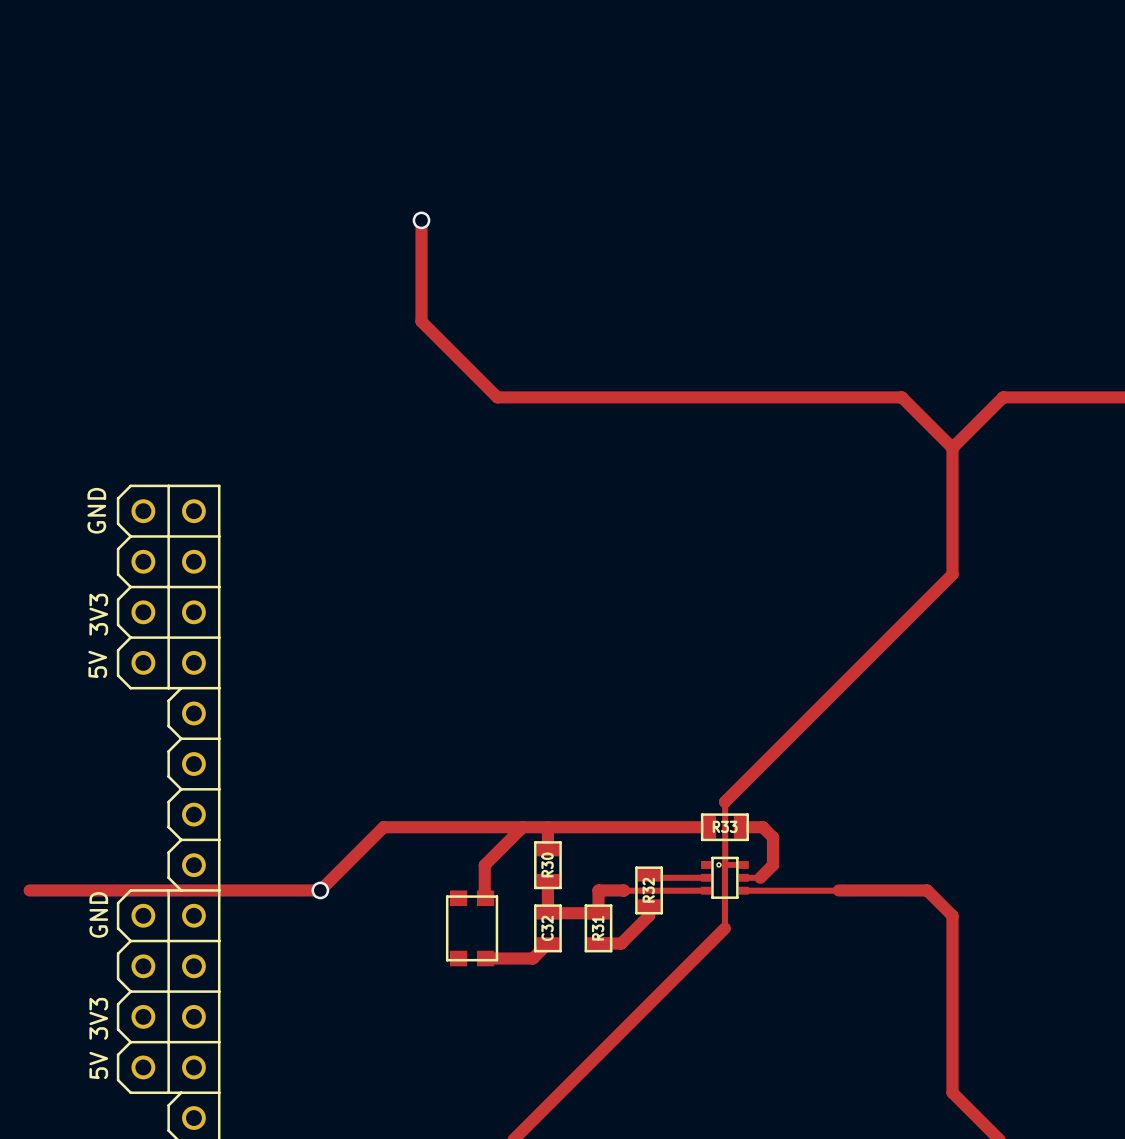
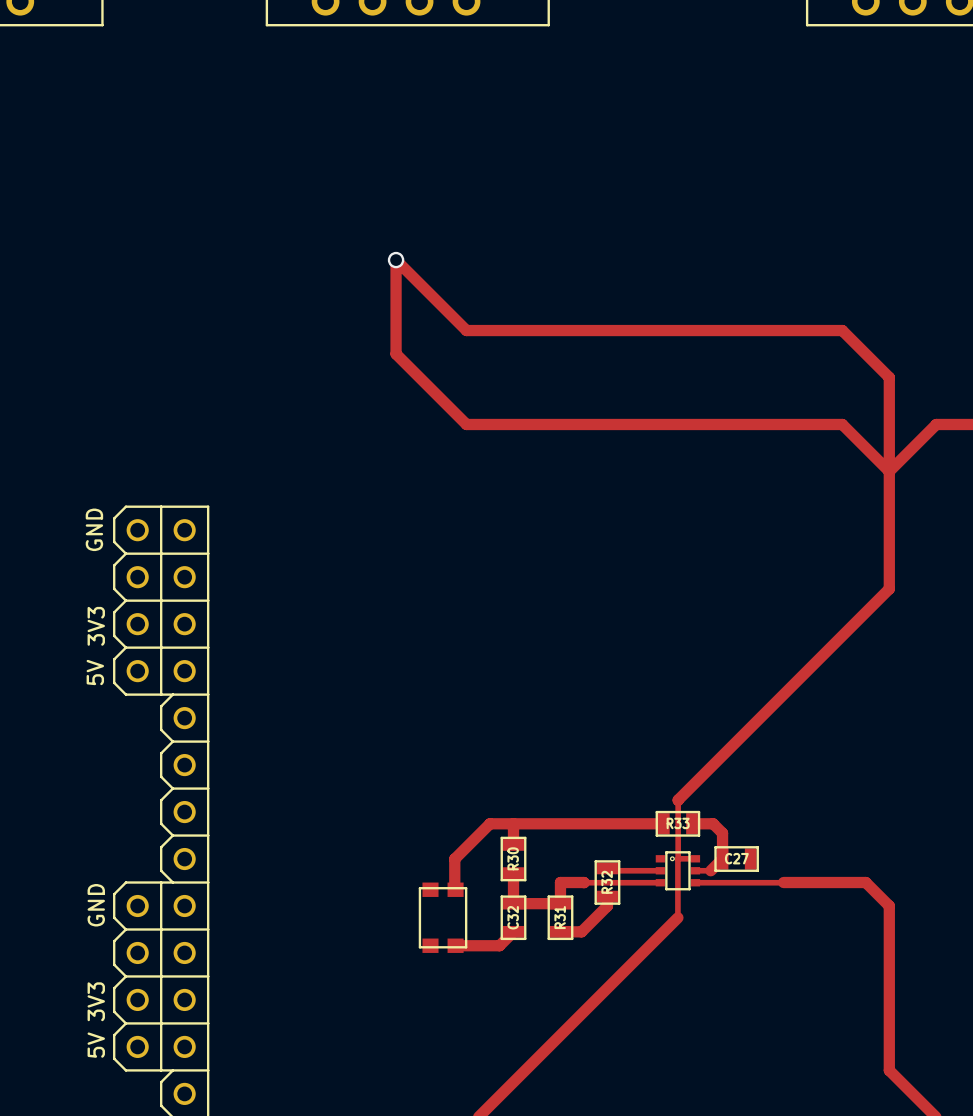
track: none -> (396, 260) (466, 330) (842, 330) (889, 377) (889, 471)
track: (522, 827) (383, 827) (320, 890) (29, 890) -> none
C27: none -> (736, 859)
via: (320, 890) -> none

